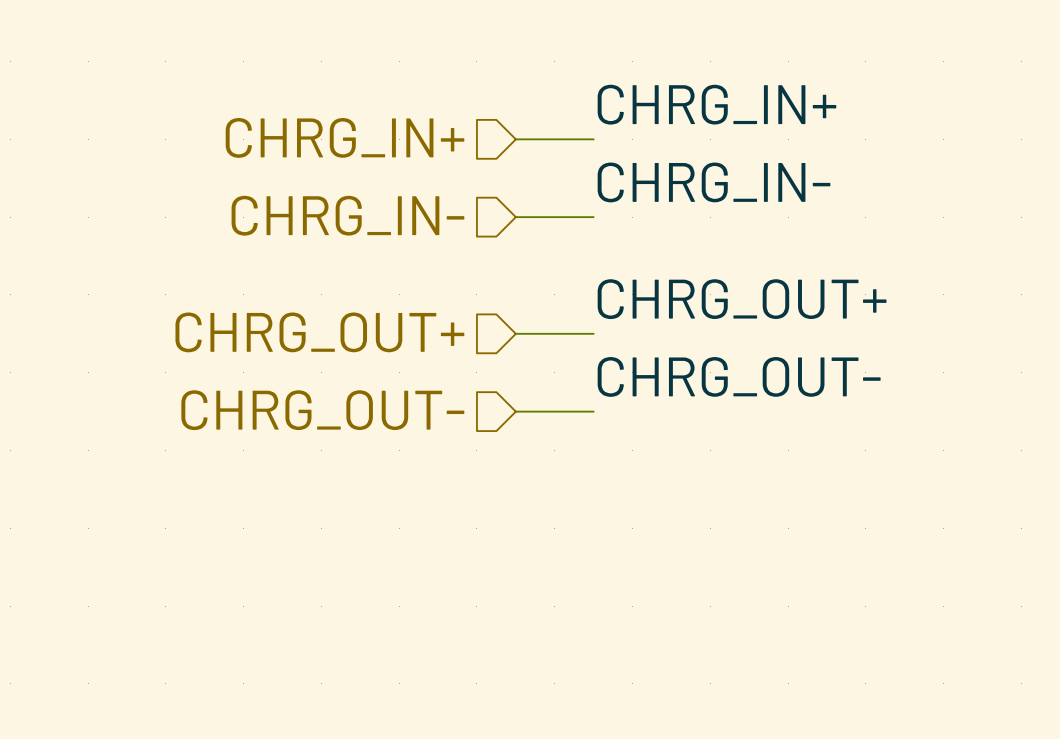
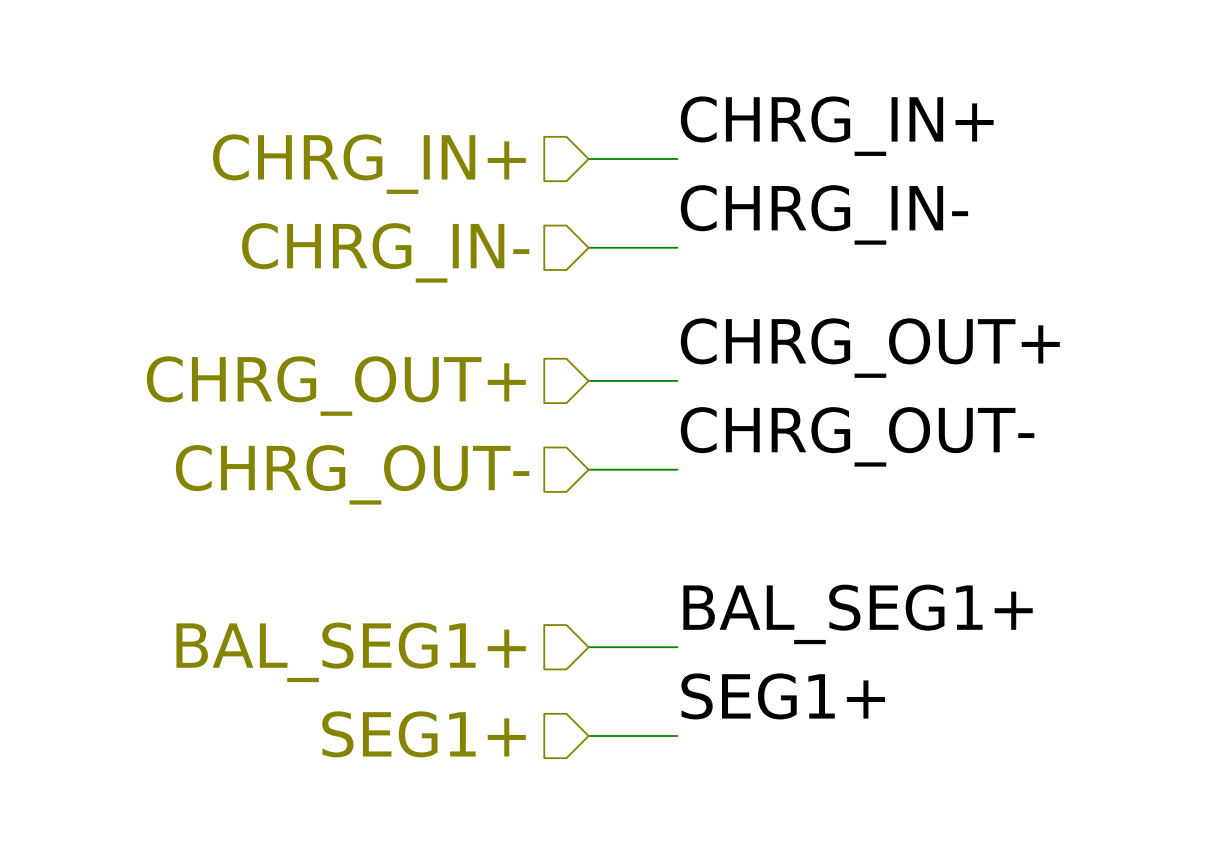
label: none -> BAL_SEG1+ (858, 614)
hierarchical label: none -> BAL_SEG1+ (351, 652)
wire: none -> (588, 647) (677, 647)
label: none -> SEG1+ (783, 696)
hierarchical label: none -> SEG1+ (424, 734)
wire: none -> (588, 735) (677, 735)

